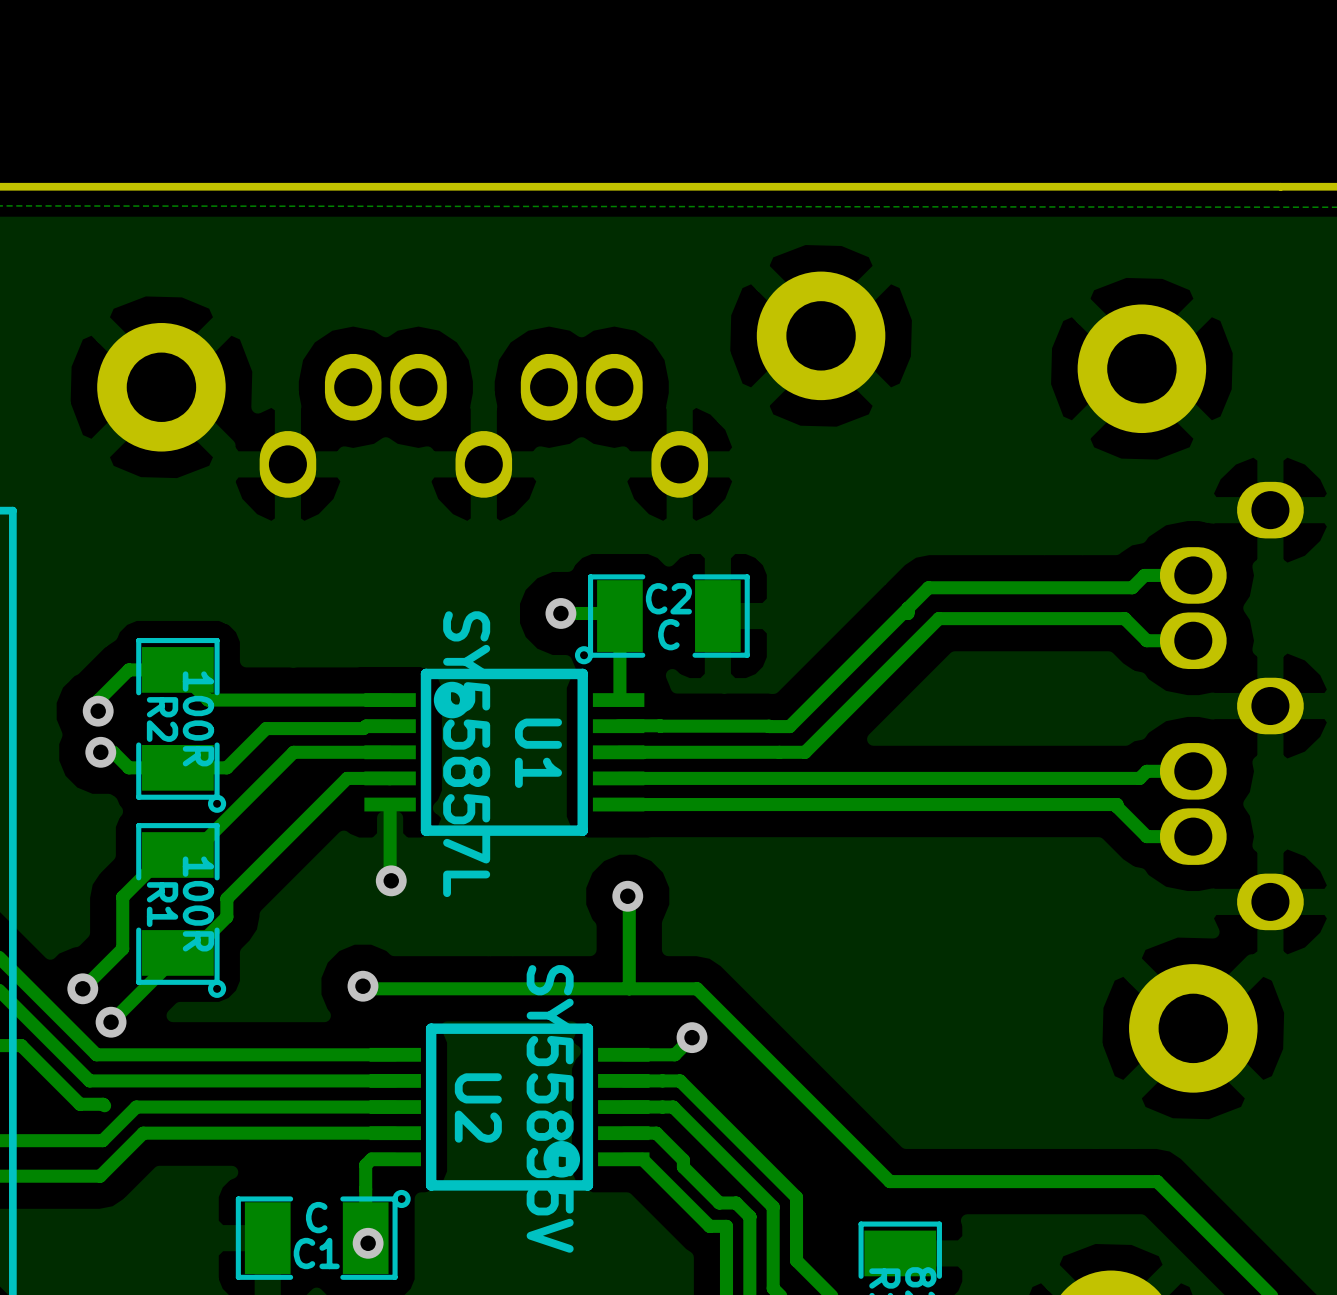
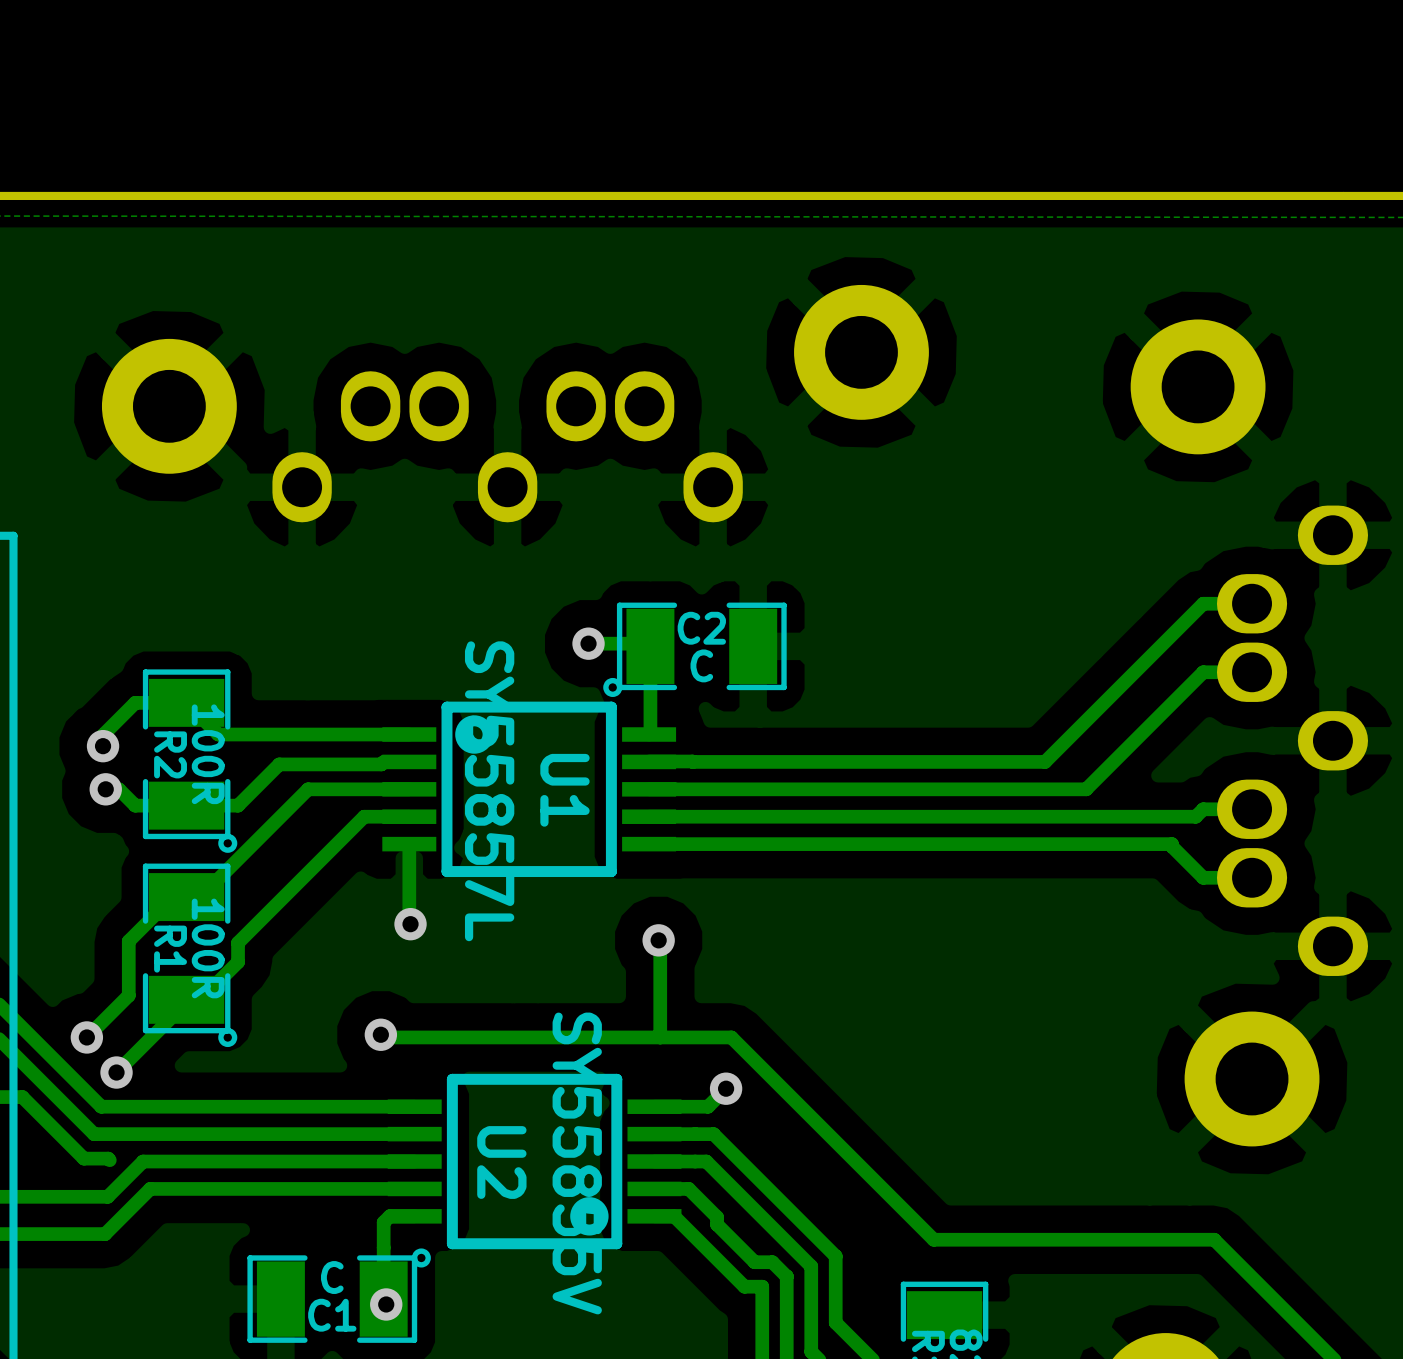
track: (1146, 575) (1132, 587) (928, 587) (789, 726) (769, 726) -> (1203, 603) (1045, 761) (807, 761)
track: (1146, 640) (1124, 618) (938, 618) (805, 752) -> (1203, 672) (1086, 789) (844, 789)

